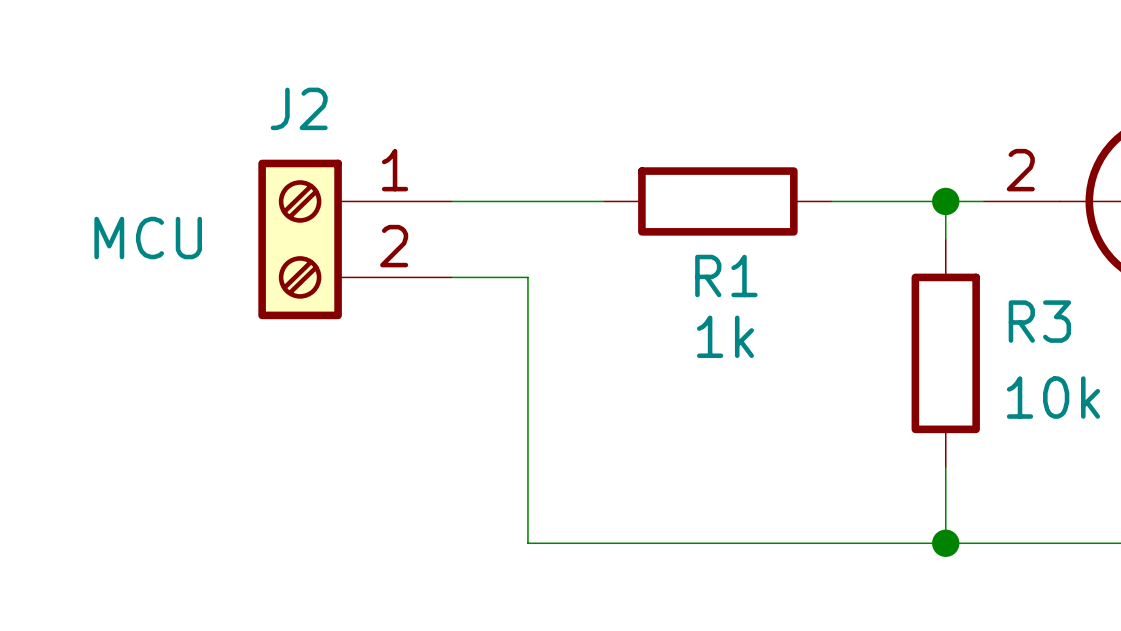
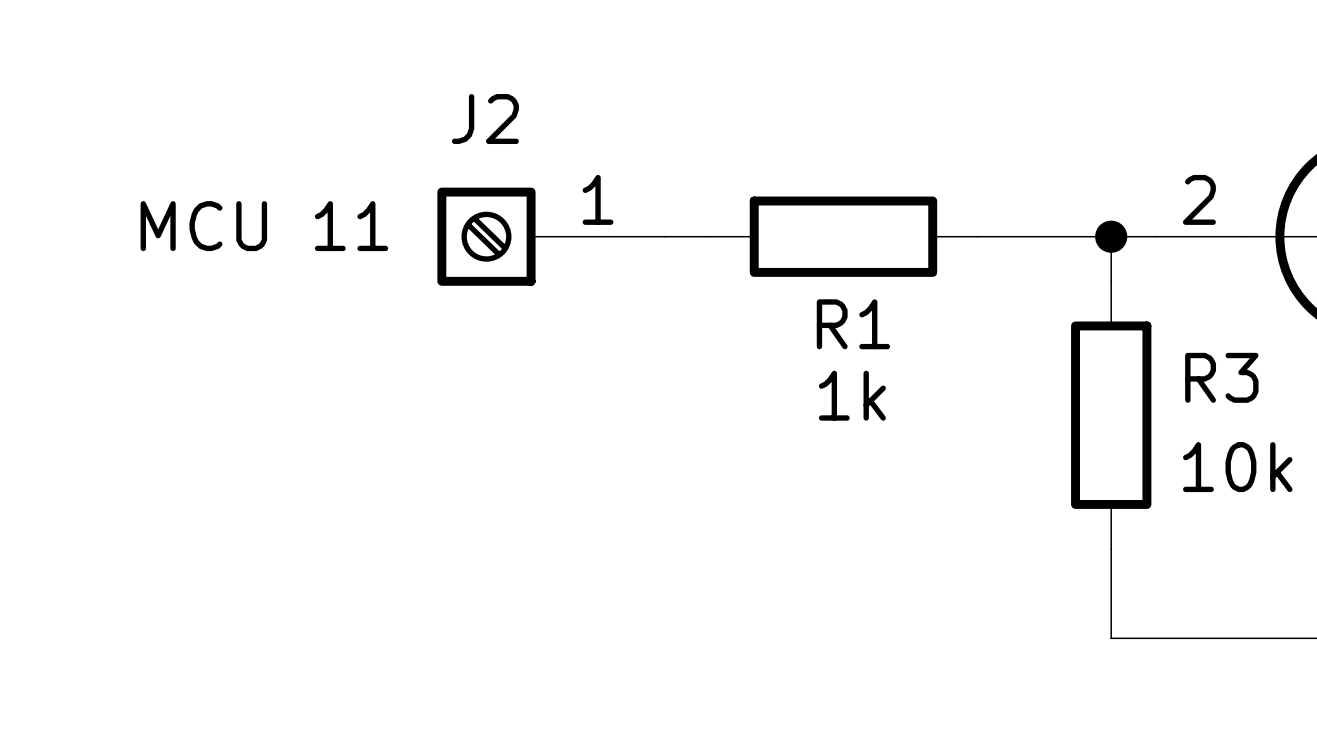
J2 symbol: [258, 159, 453, 320] -> [437, 187, 665, 286]
J2 value: MCU (148, 238) -> MCU 11 (264, 226)
wire: (452, 277) (527, 277) (527, 543) (945, 543) -> none
junction: (945, 543) -> none

